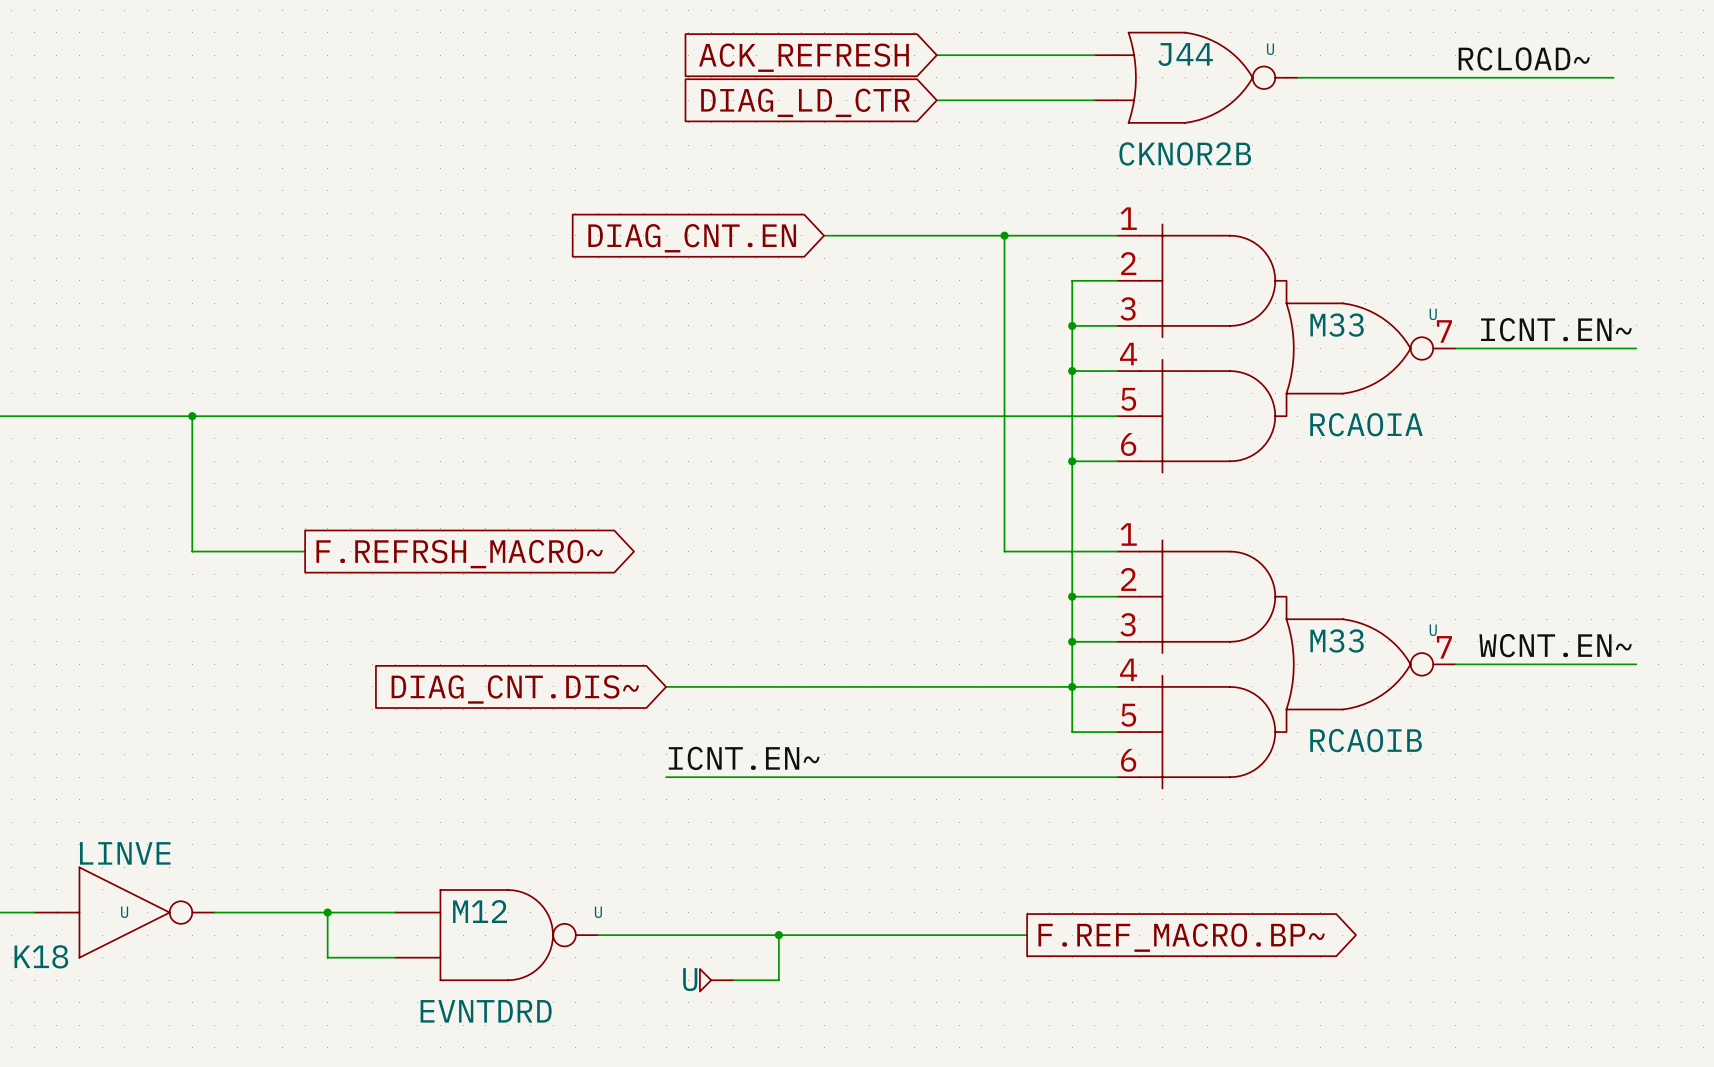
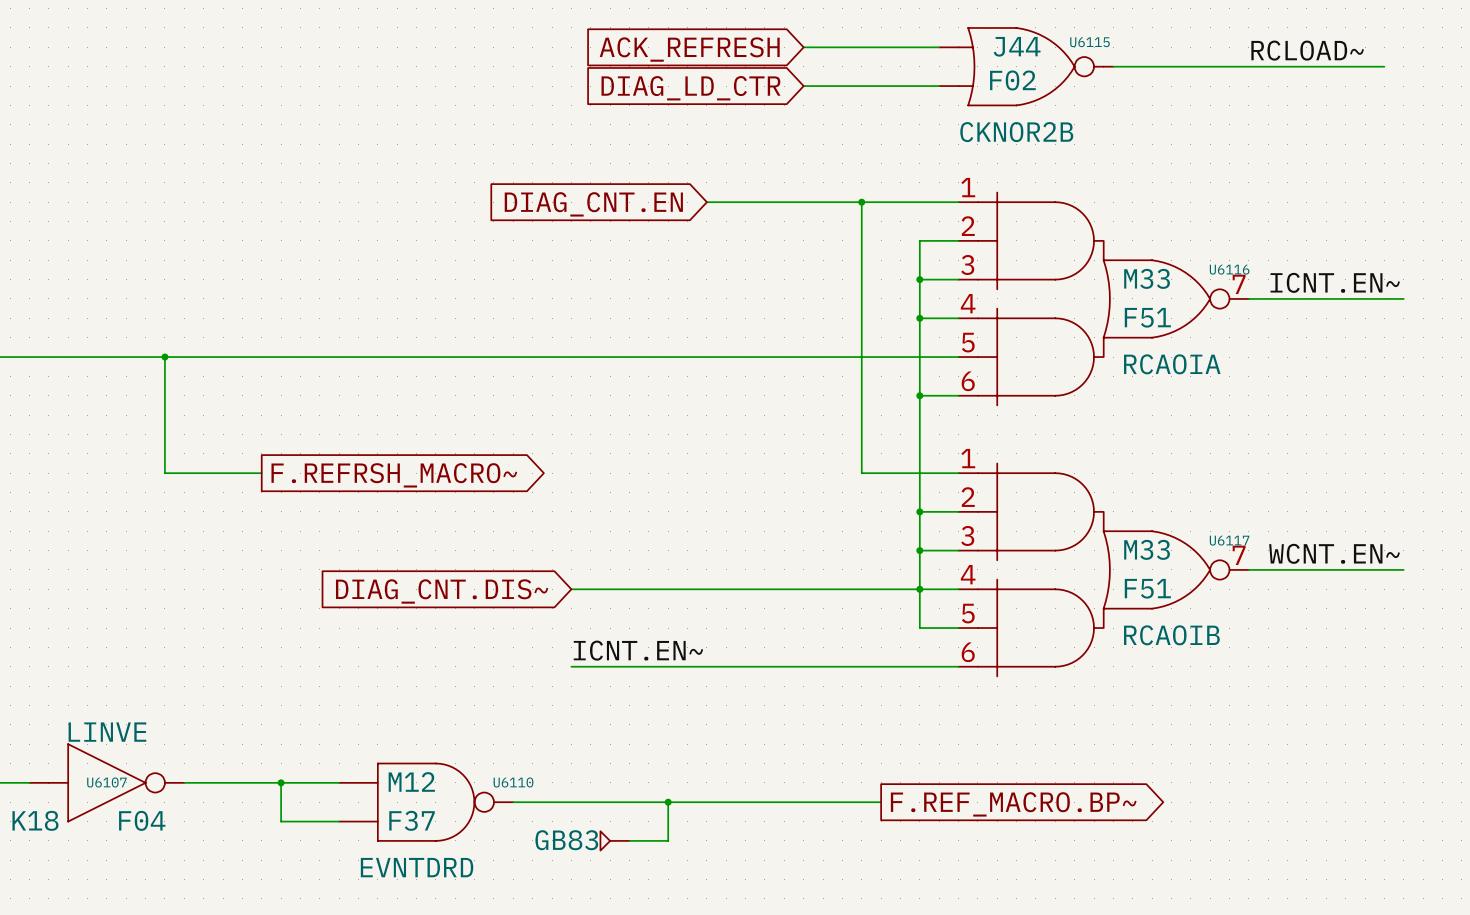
U name: U (1270, 49) -> U6115 (1089, 42)
U value: none -> F02 (1012, 80)
U name: U (1433, 314) -> U6116 (1229, 269)
U value: none -> F51 (1147, 317)
U name: U (1433, 630) -> U6117 (1229, 540)
U value: none -> F51 (1147, 588)
U name: U (124, 912) -> U6107 (106, 782)
U name: U (598, 912) -> U6110 (513, 782)
U value: none -> F04 (142, 820)
U value: none -> F37 (412, 820)
U name: U (690, 979) -> GB83 (566, 840)

